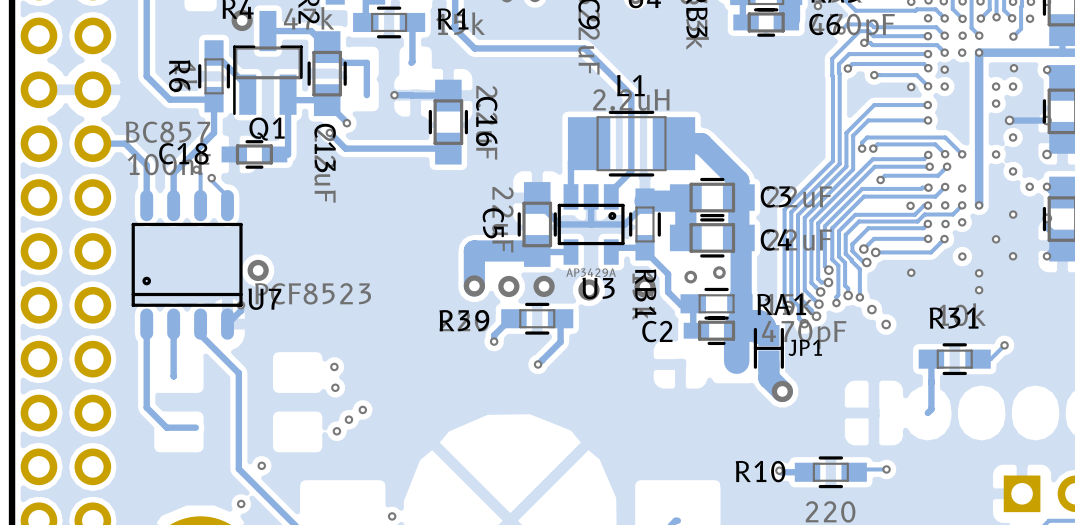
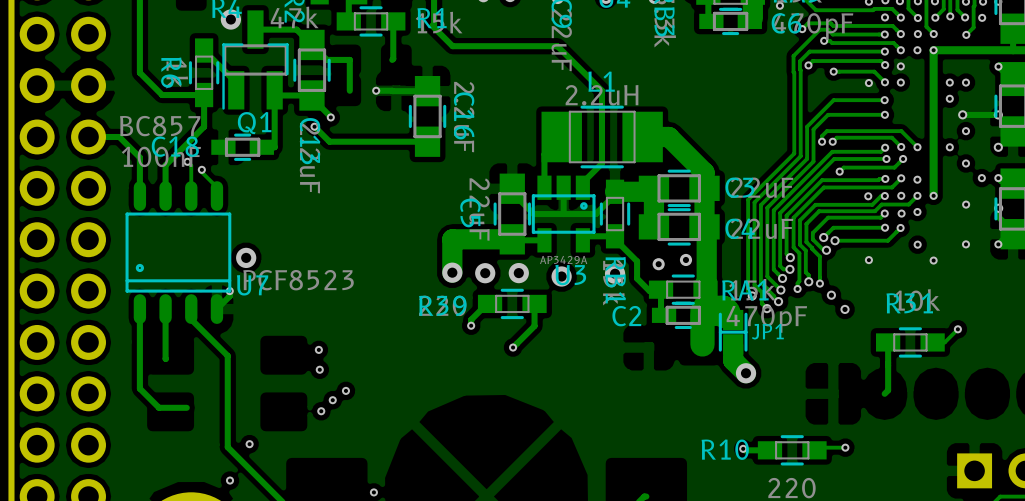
via: (1013, 68) -> none
via: (996, 239) -> none
via: (979, 290) -> none

